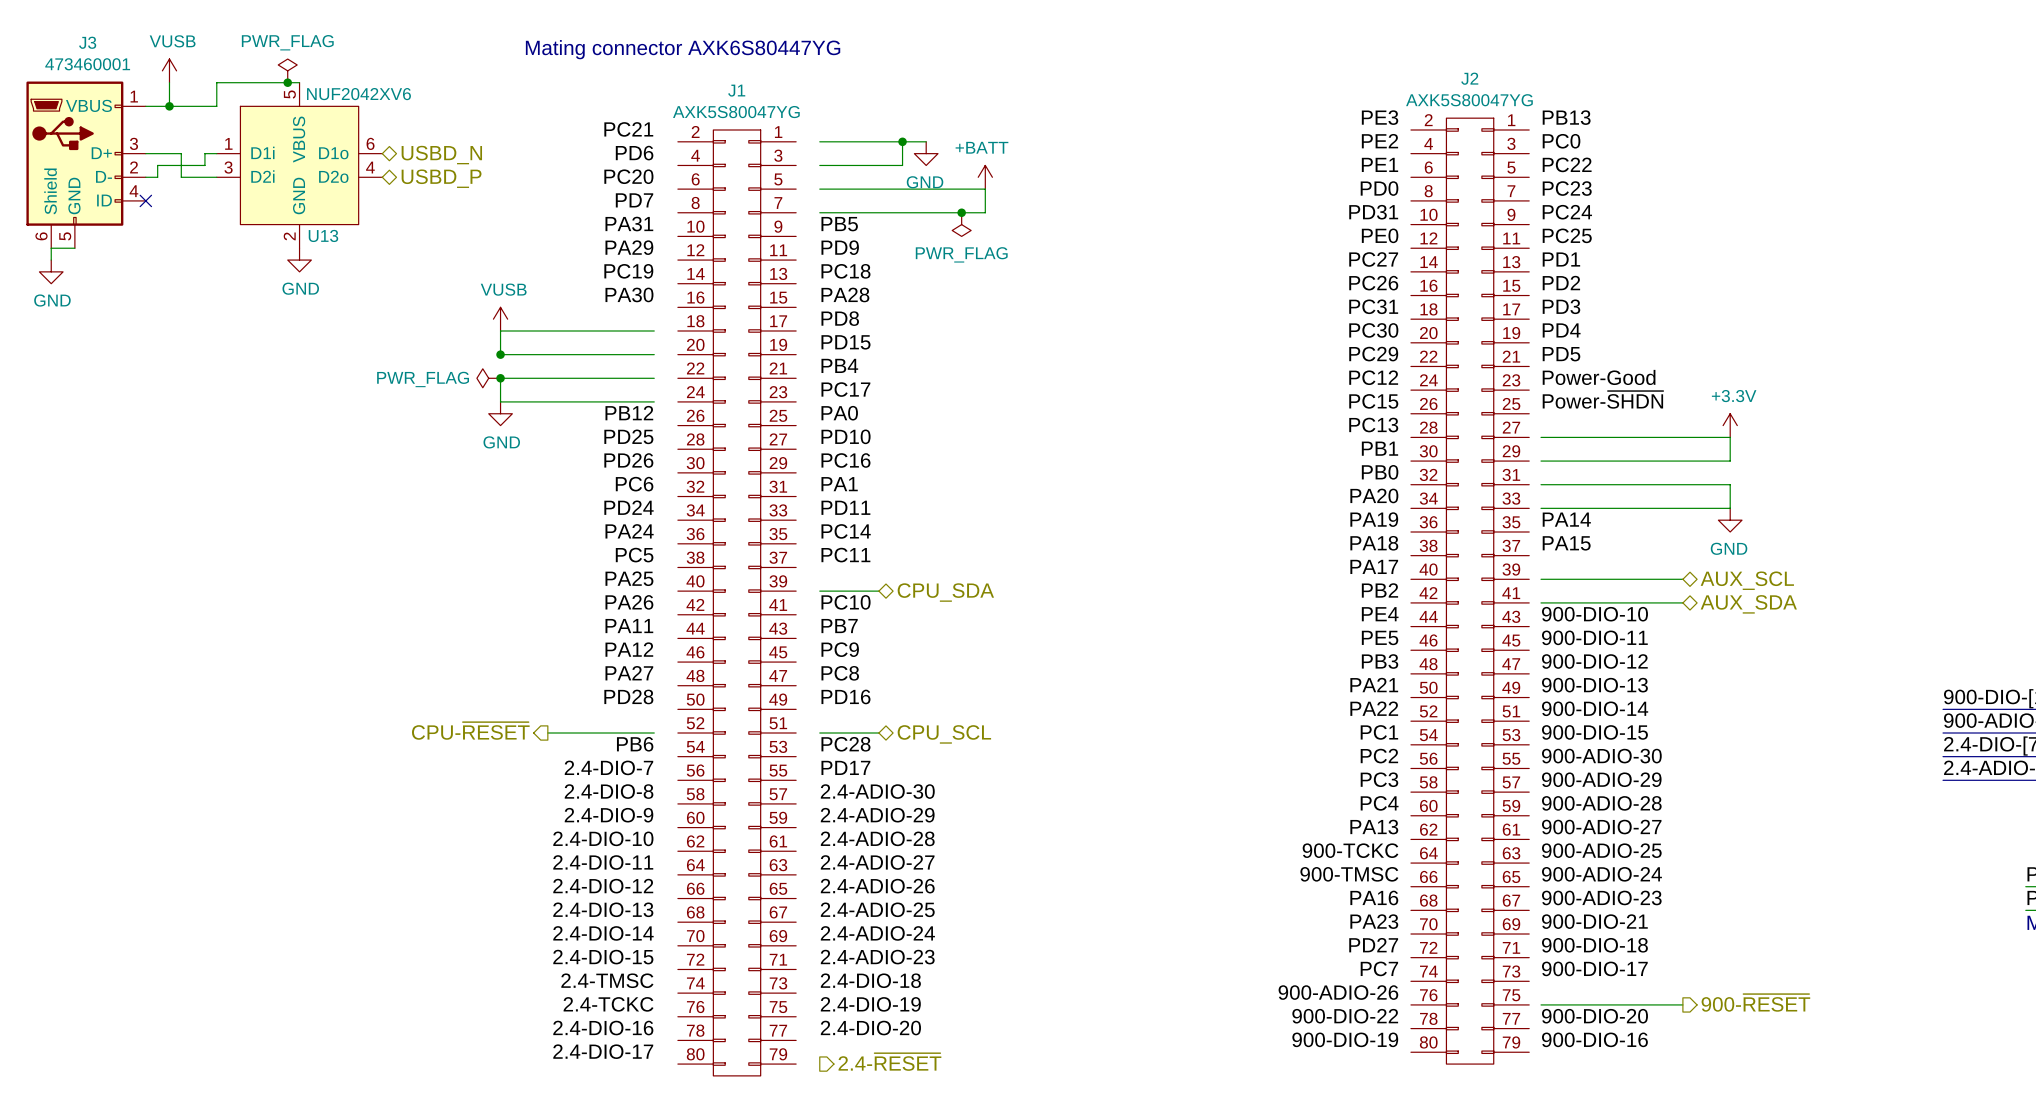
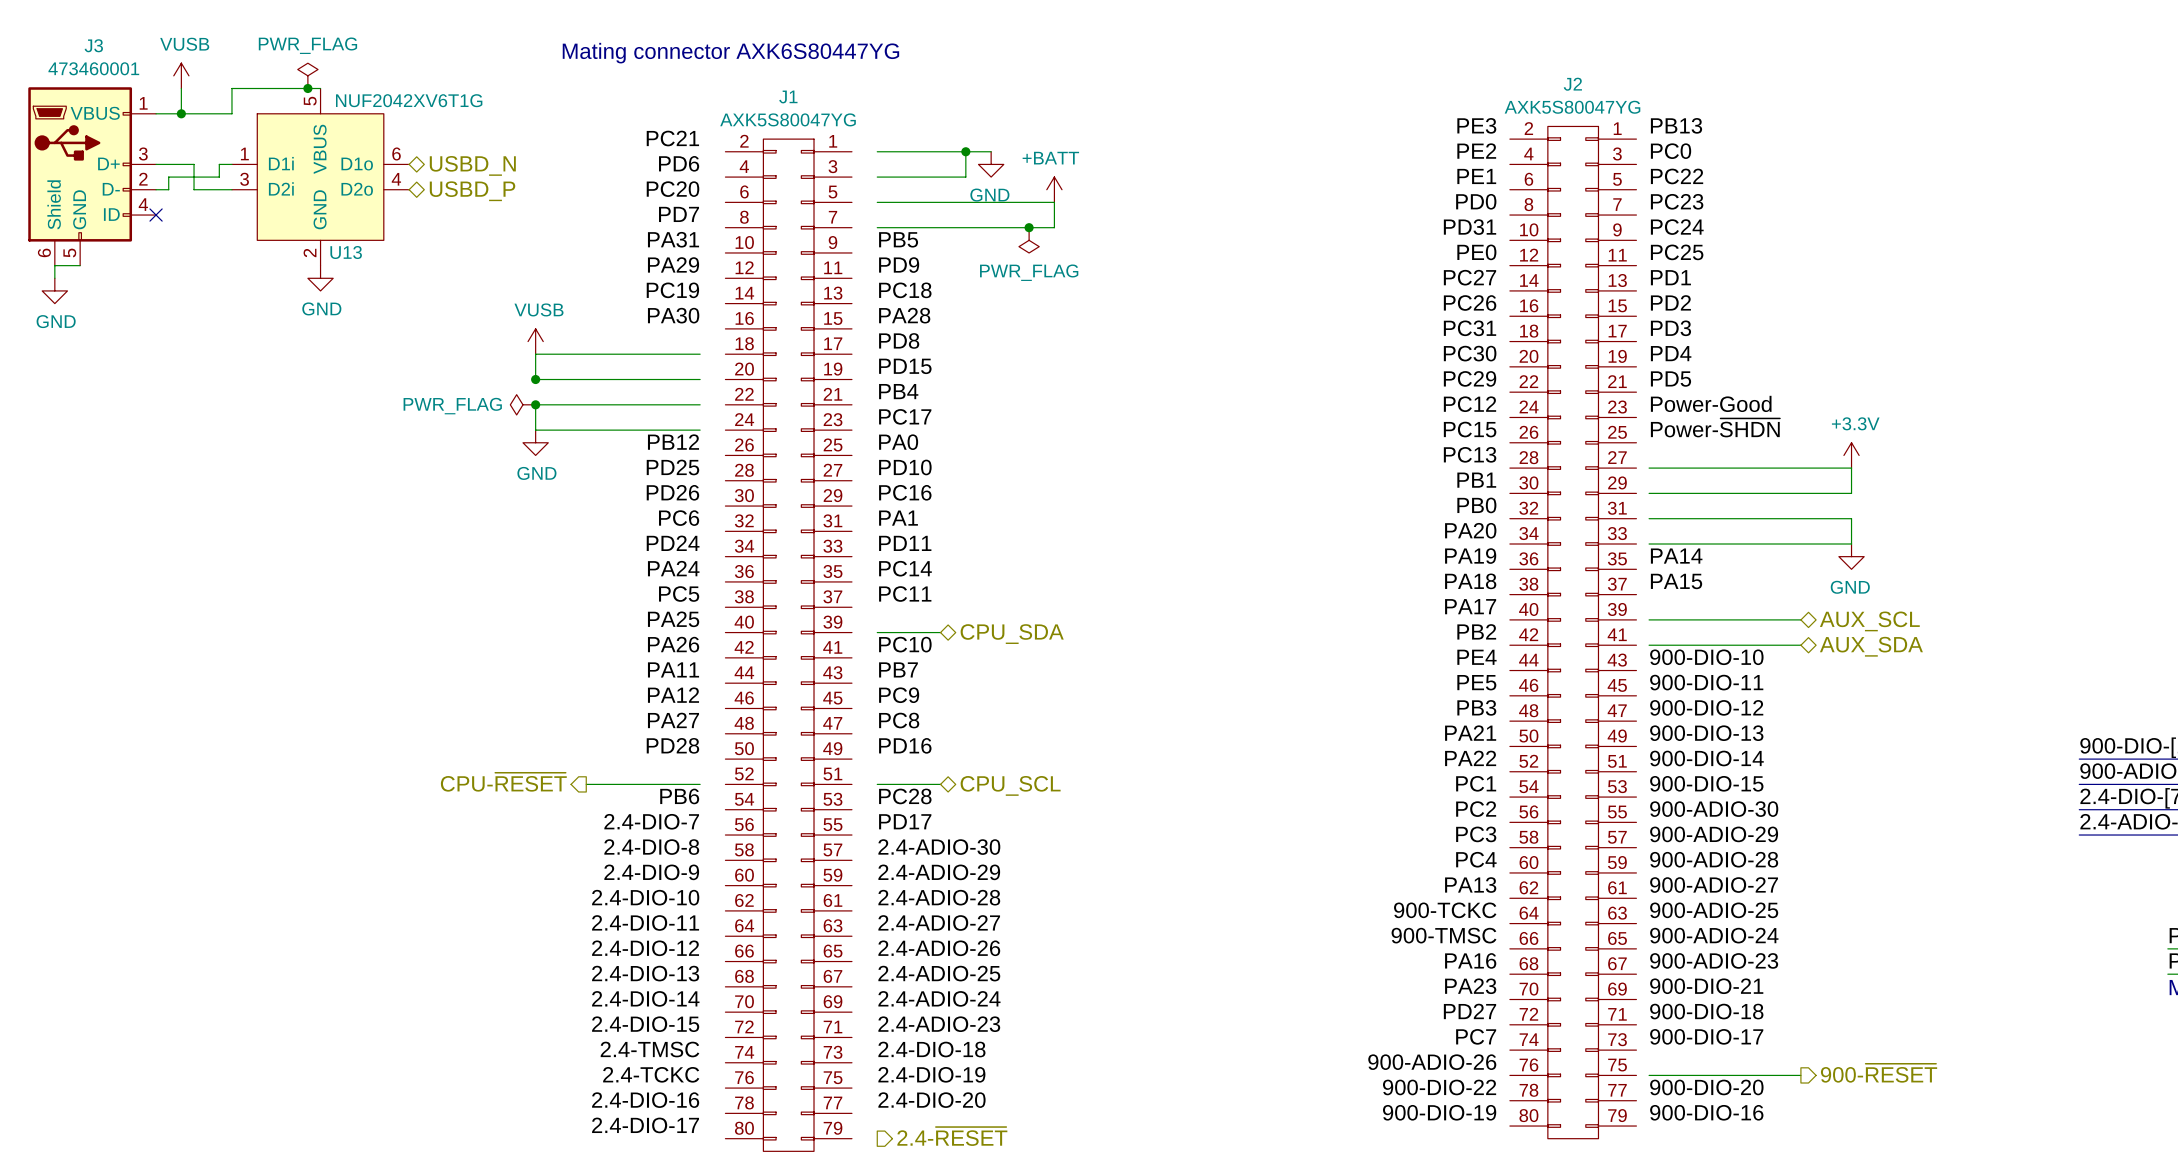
U13 value: NUF2042XV6 (358, 94) -> NUF2042XV6T1G (409, 100)

